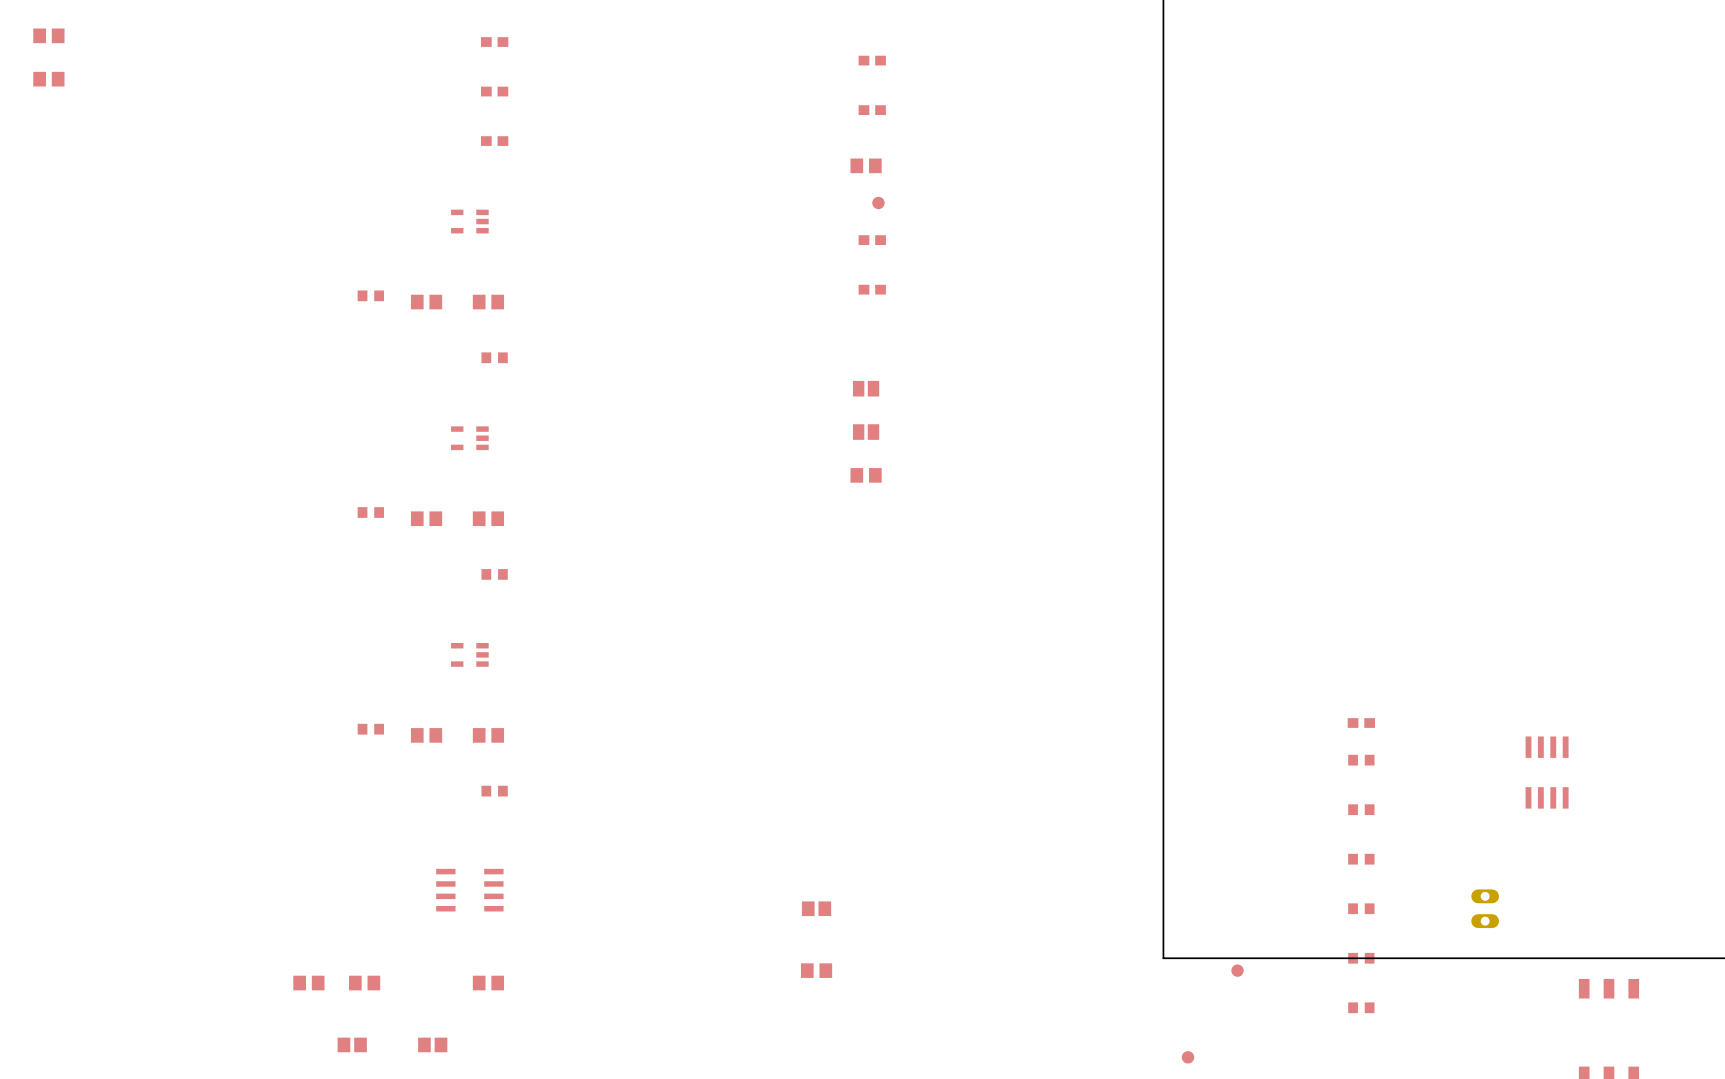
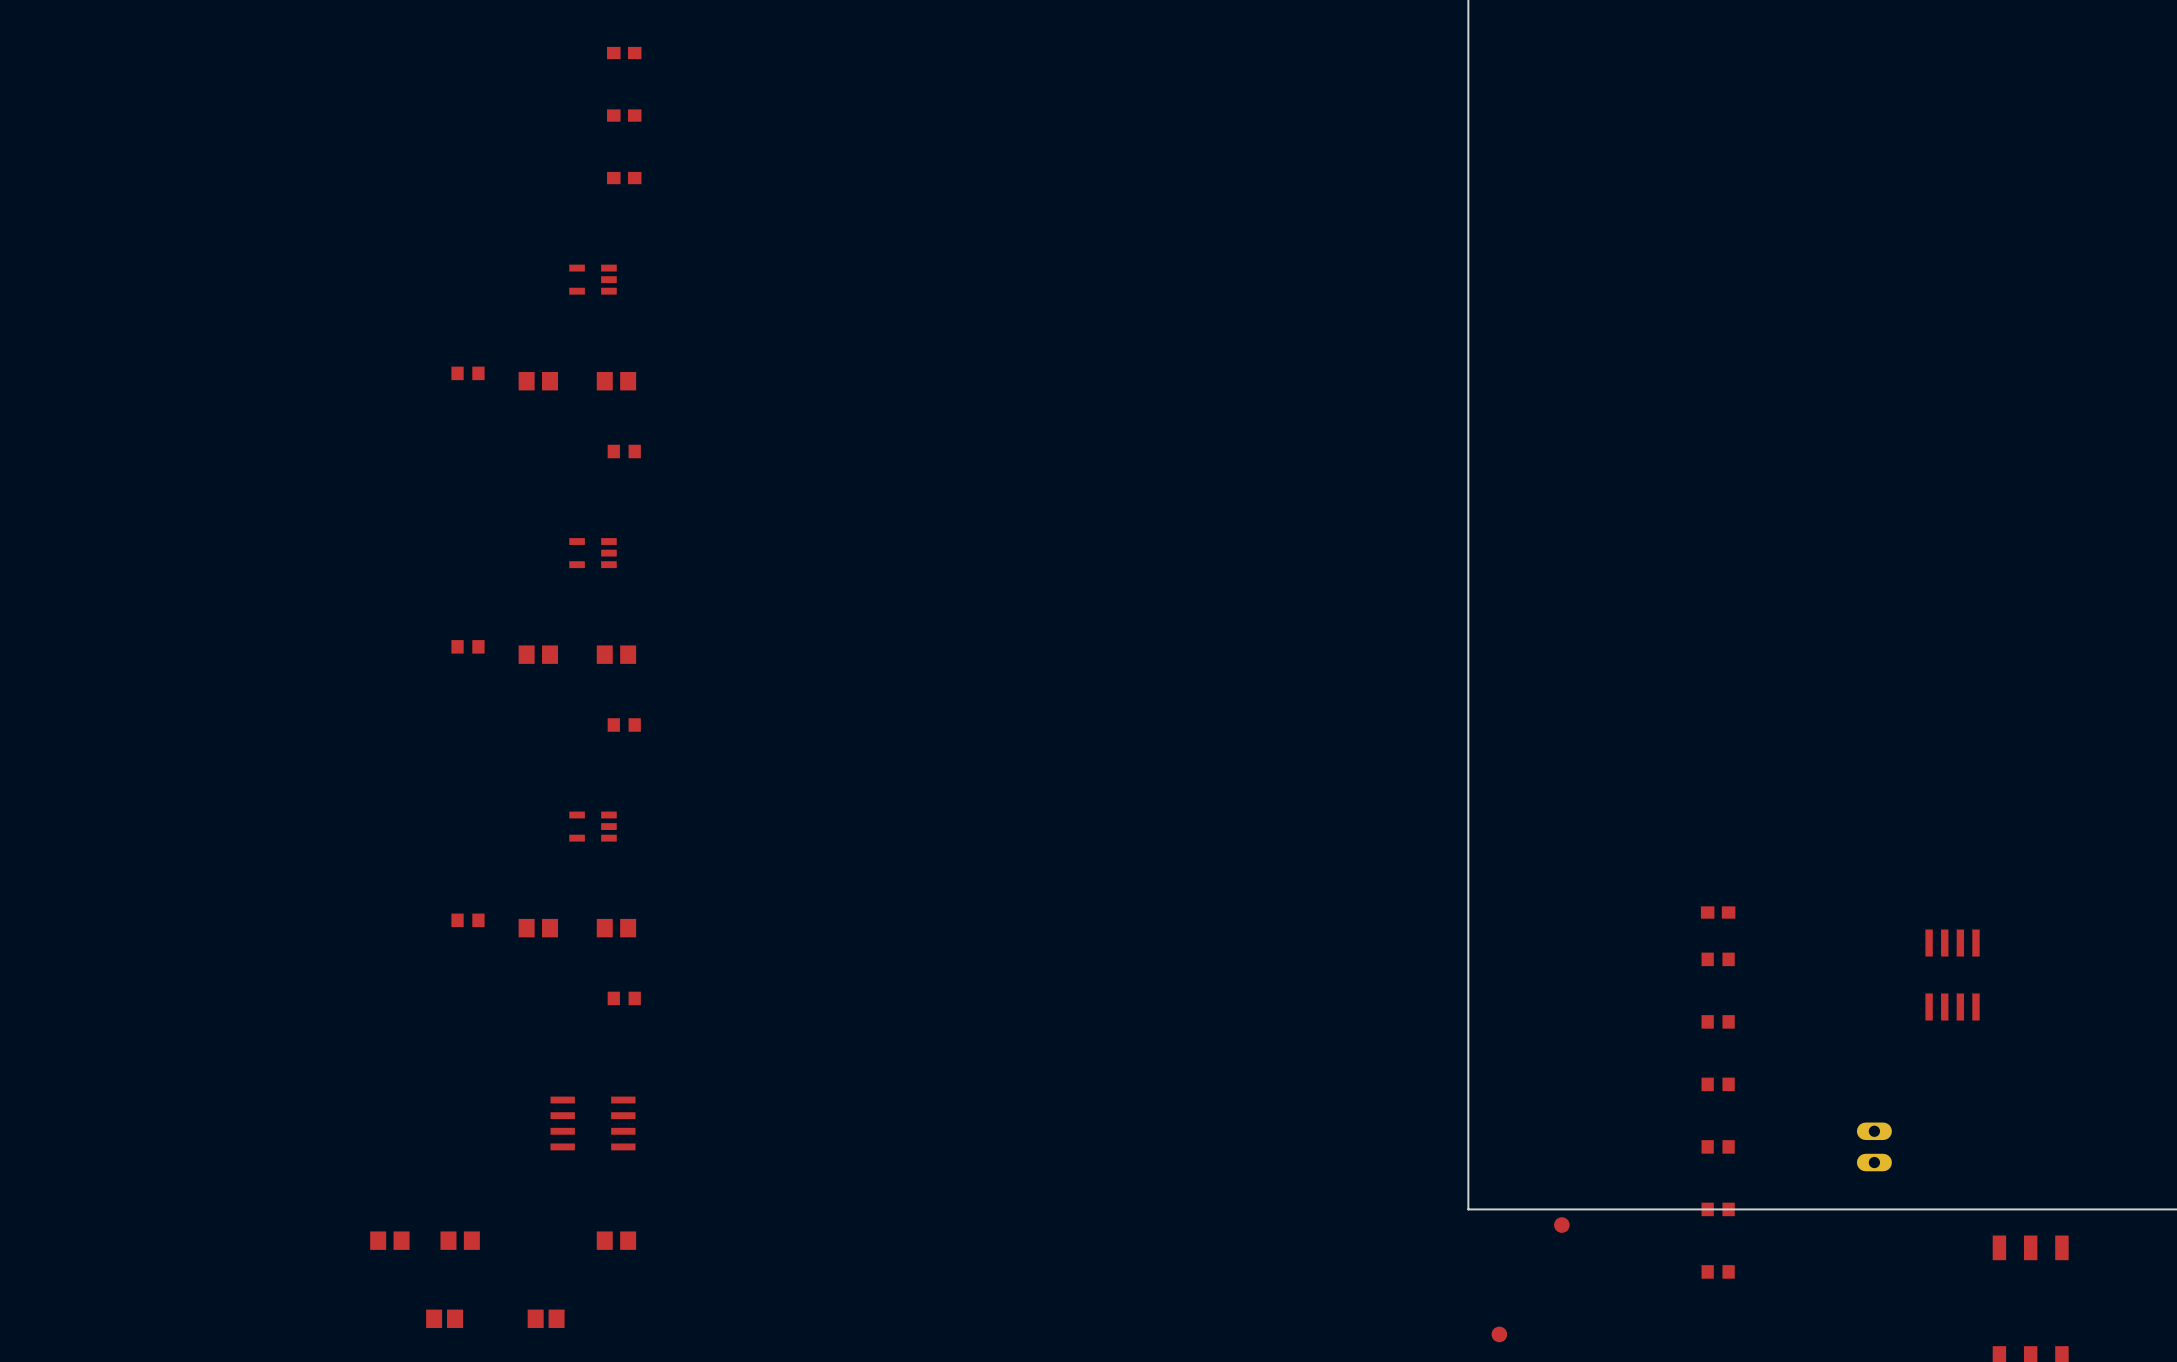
part: (48, 35) -> none
part: (872, 60) -> none
part: (48, 79) -> none
part: (872, 110) -> none
part: (866, 165) -> none
part: (878, 202) -> none
part: (872, 240) -> none
part: (872, 289) -> none
part: (866, 388) -> none
part: (866, 432) -> none
part: (866, 475) -> none
part: (816, 908) -> none
part: (816, 970) -> none

